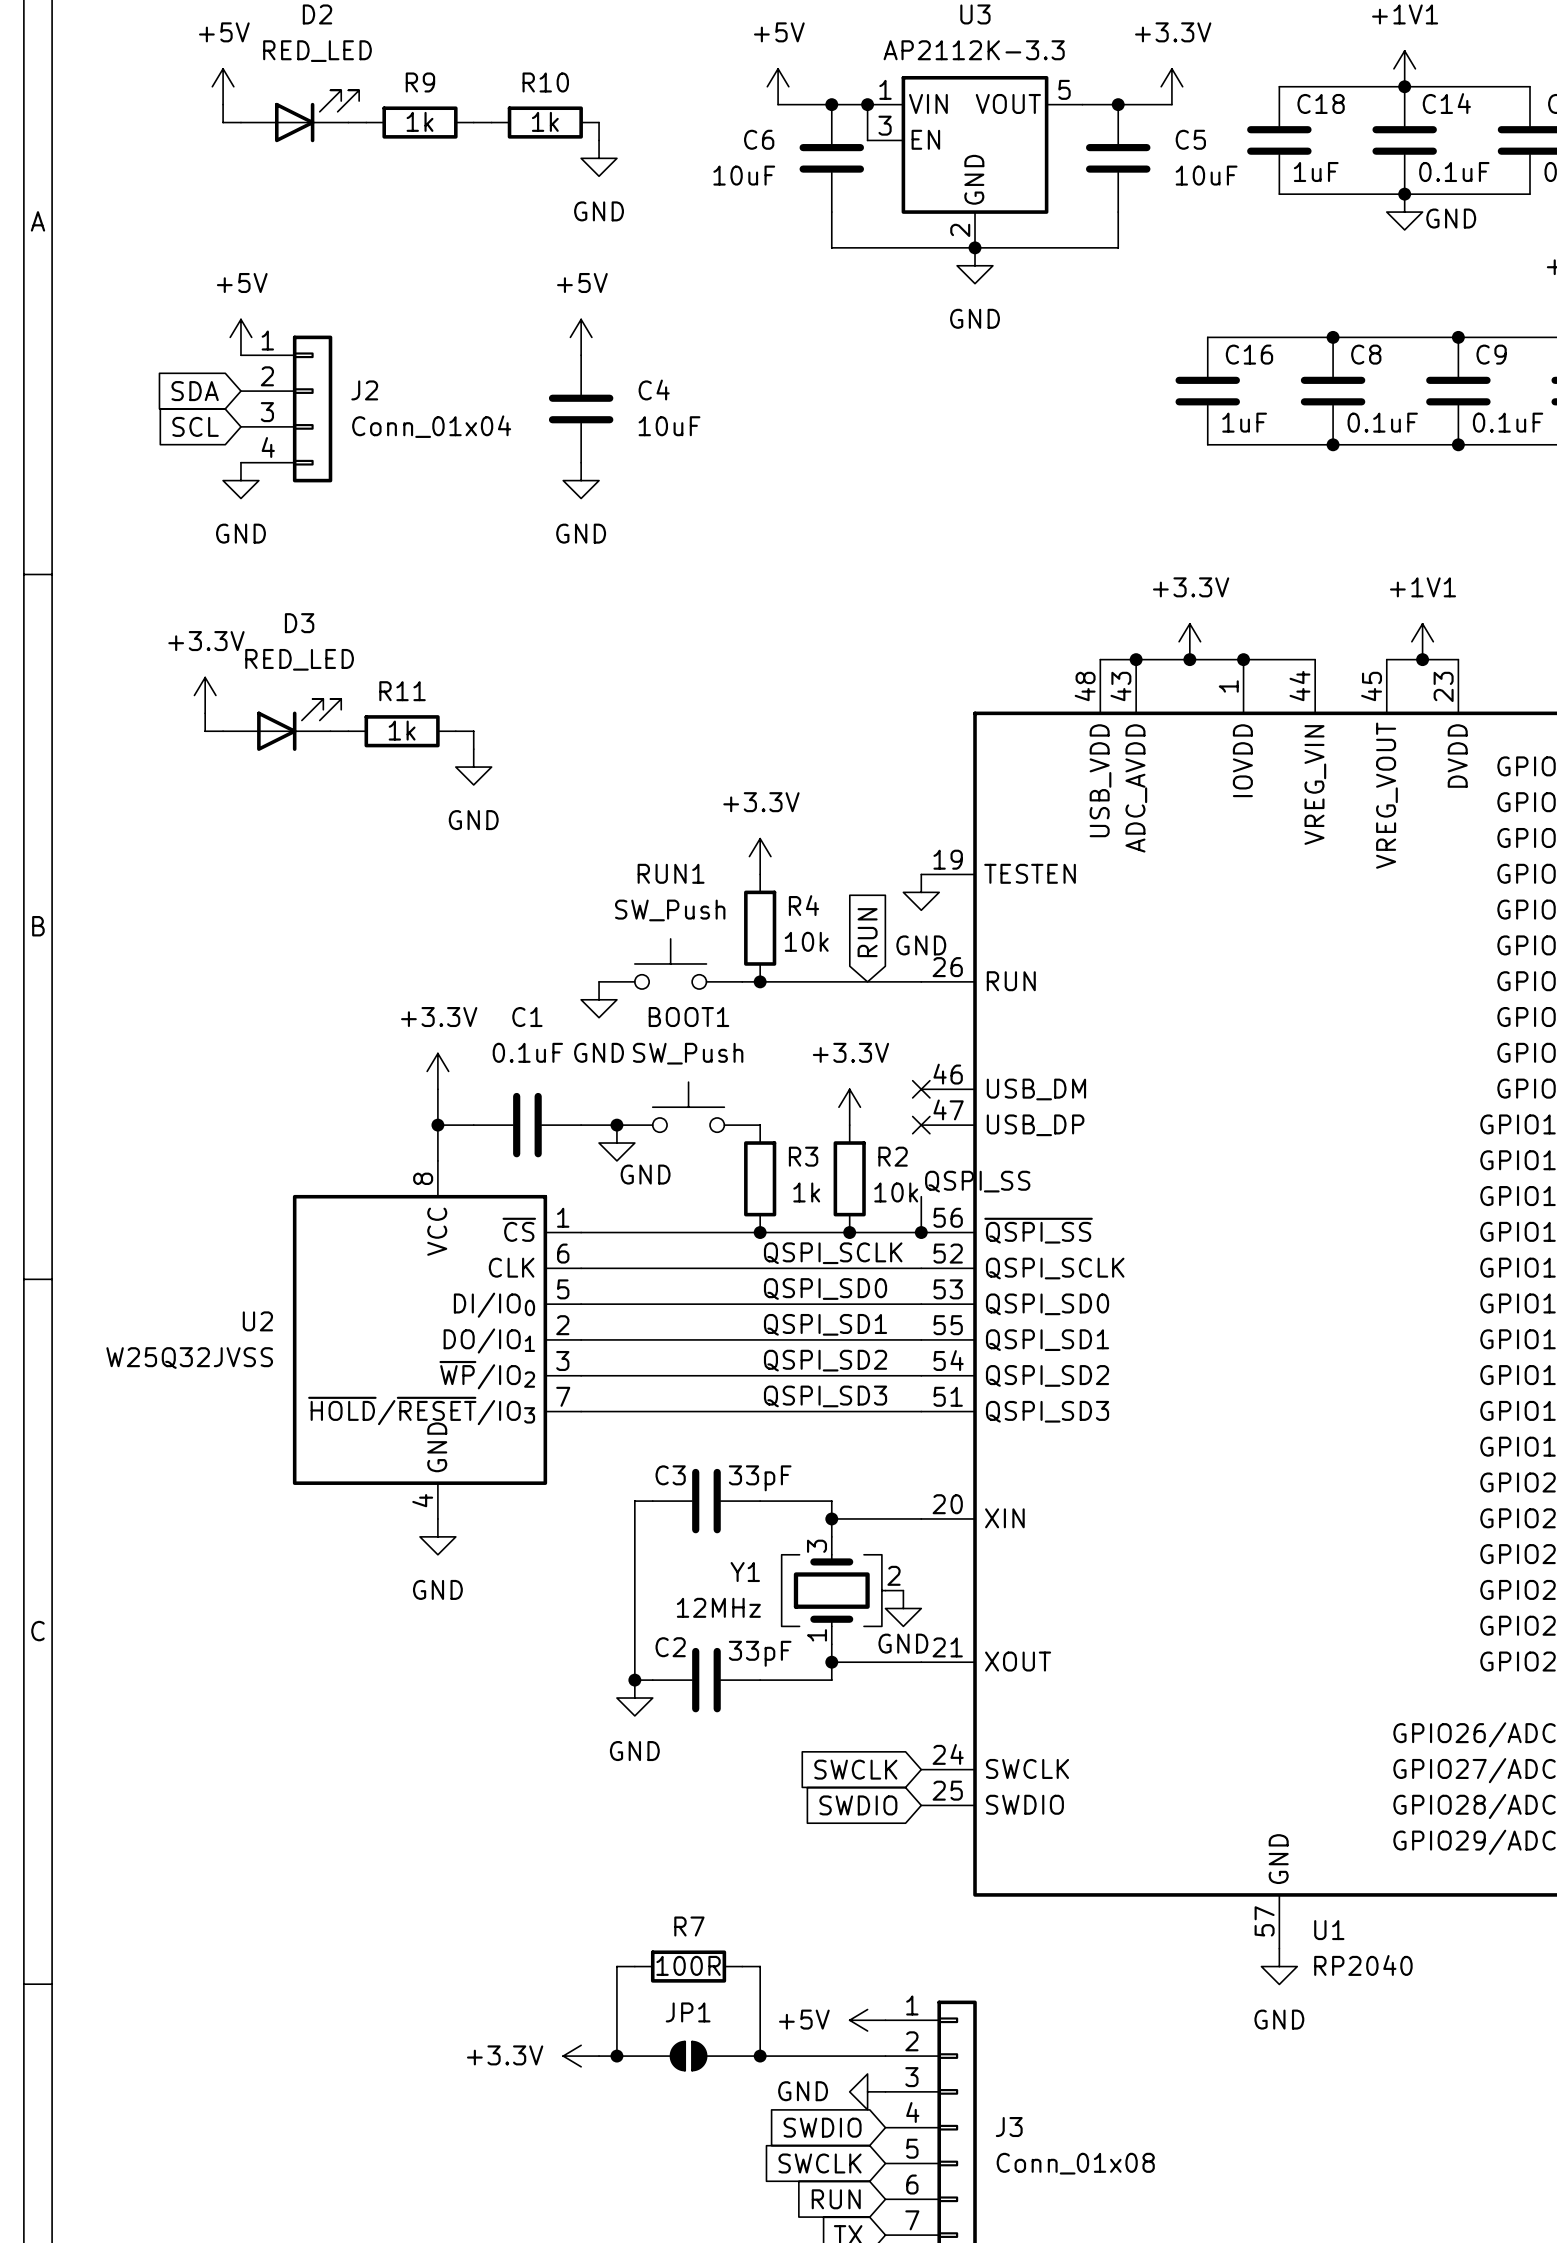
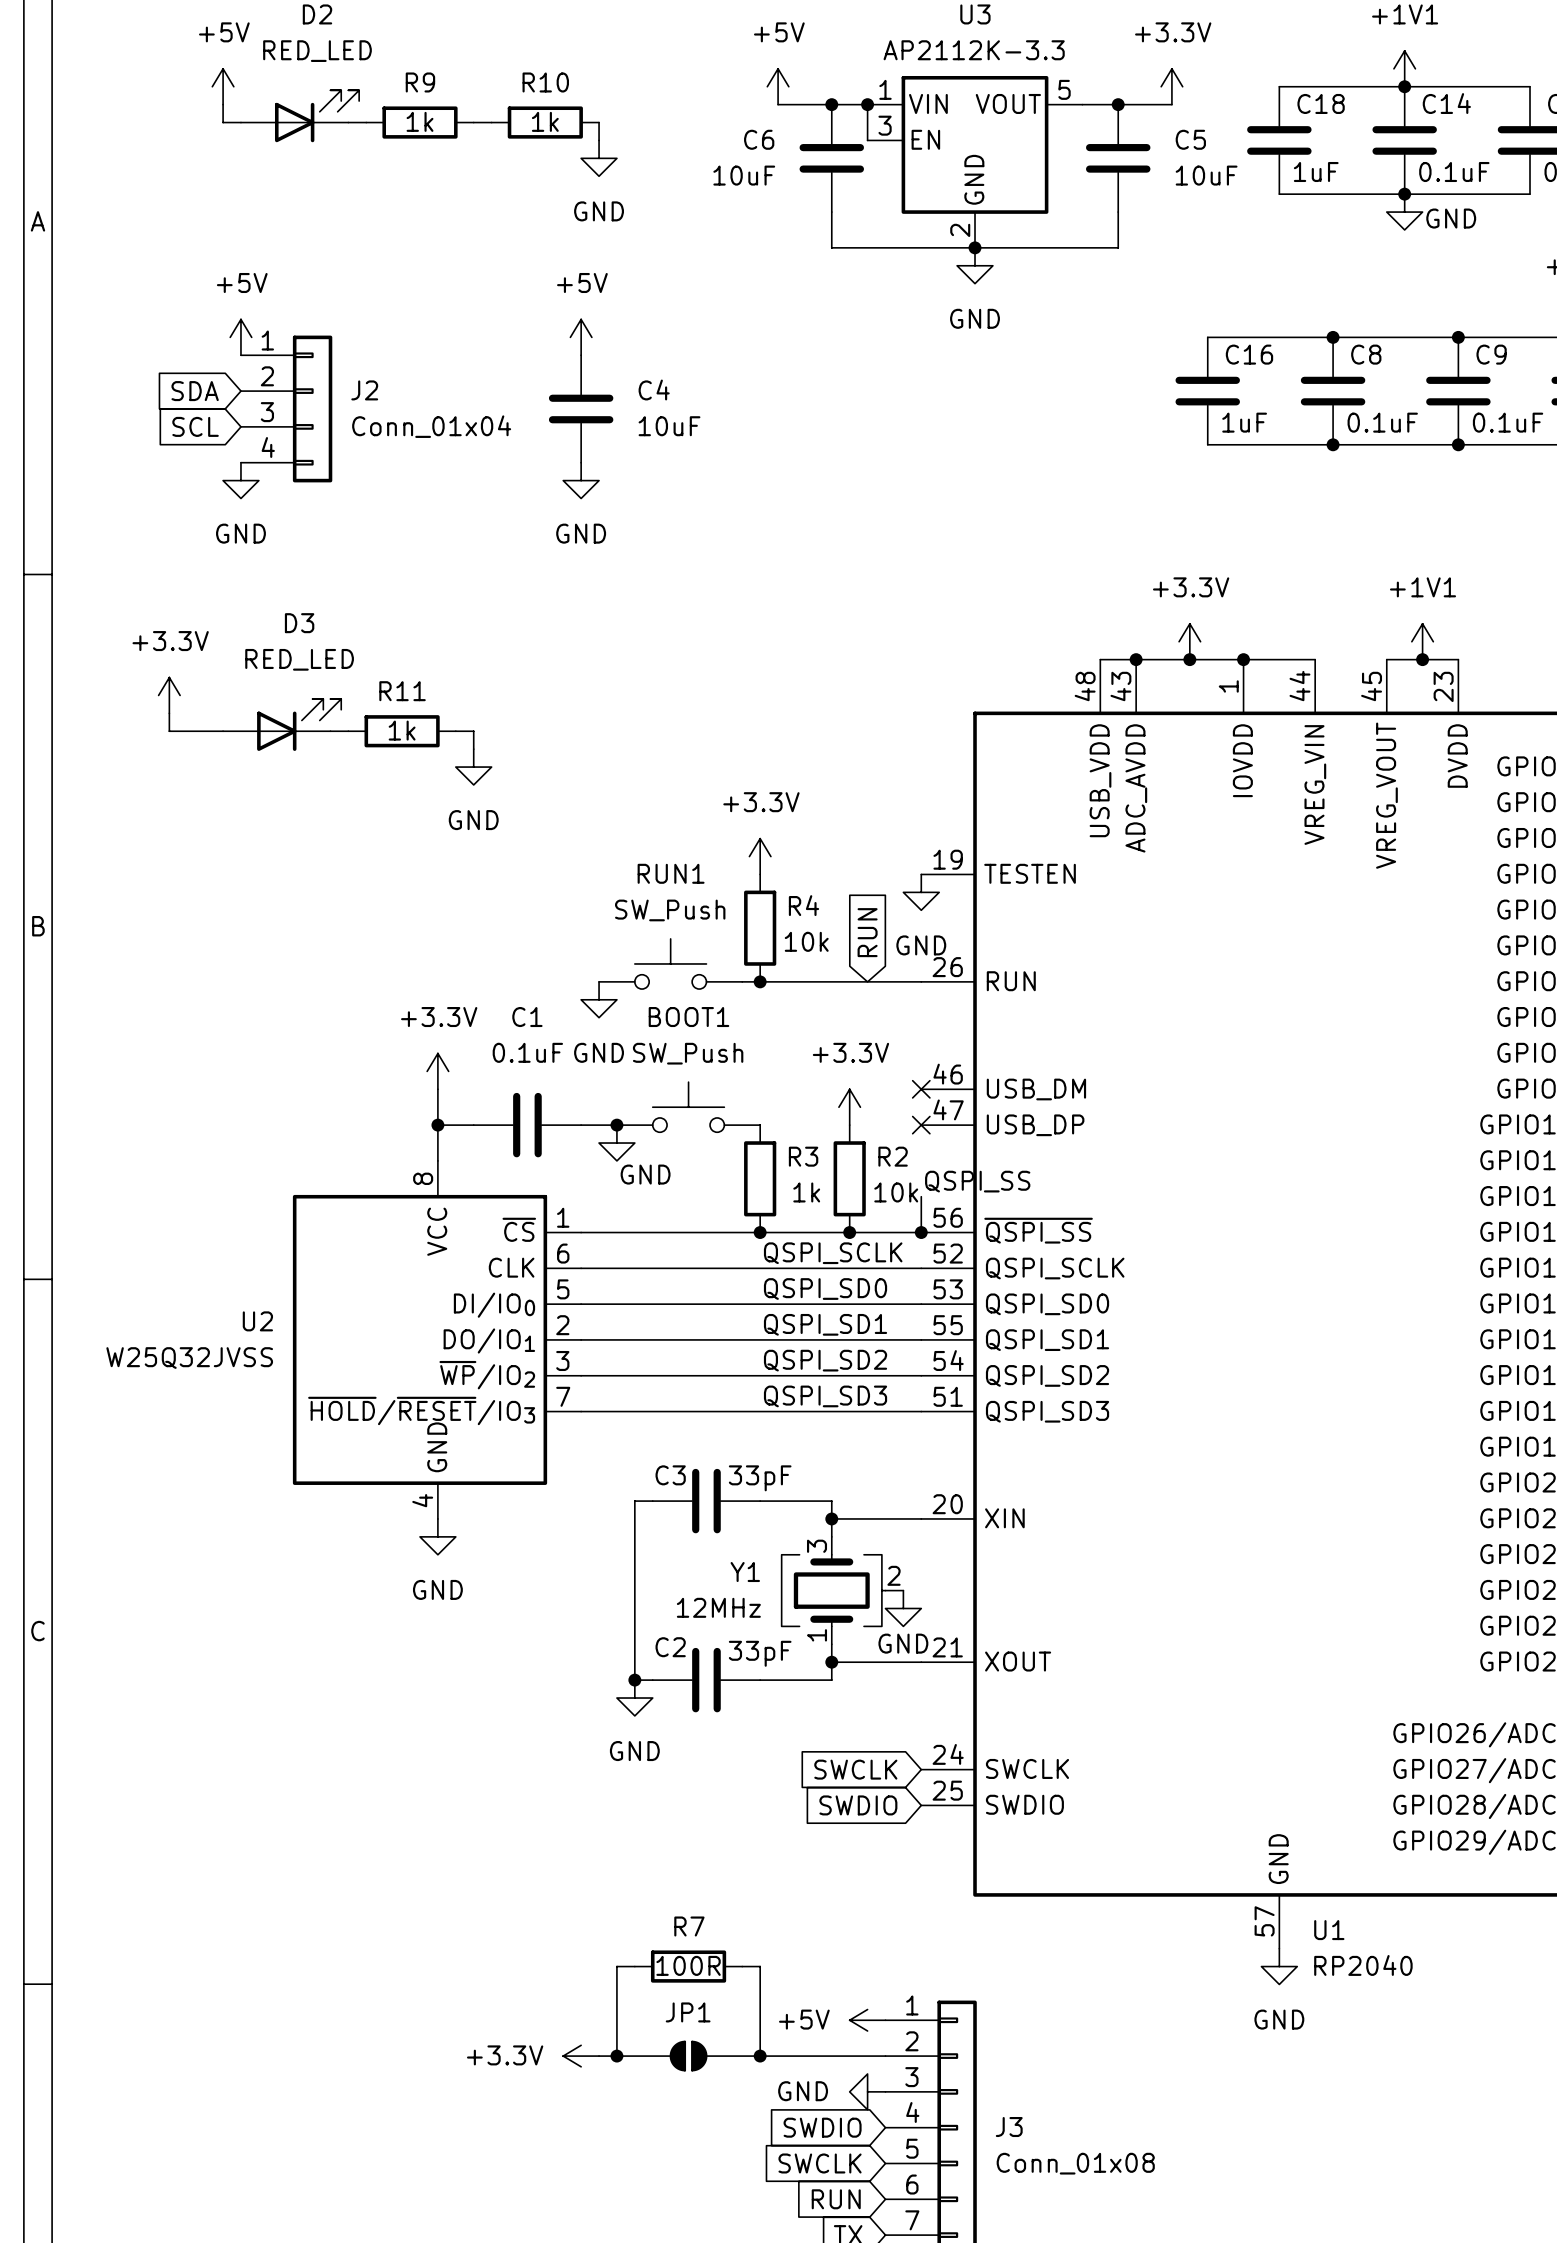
power symbol position: +3.3V (205, 695) -> +3.3V (169, 695)
wire: (205, 713) (205, 731) -> (169, 713) (169, 731) (205, 731)

